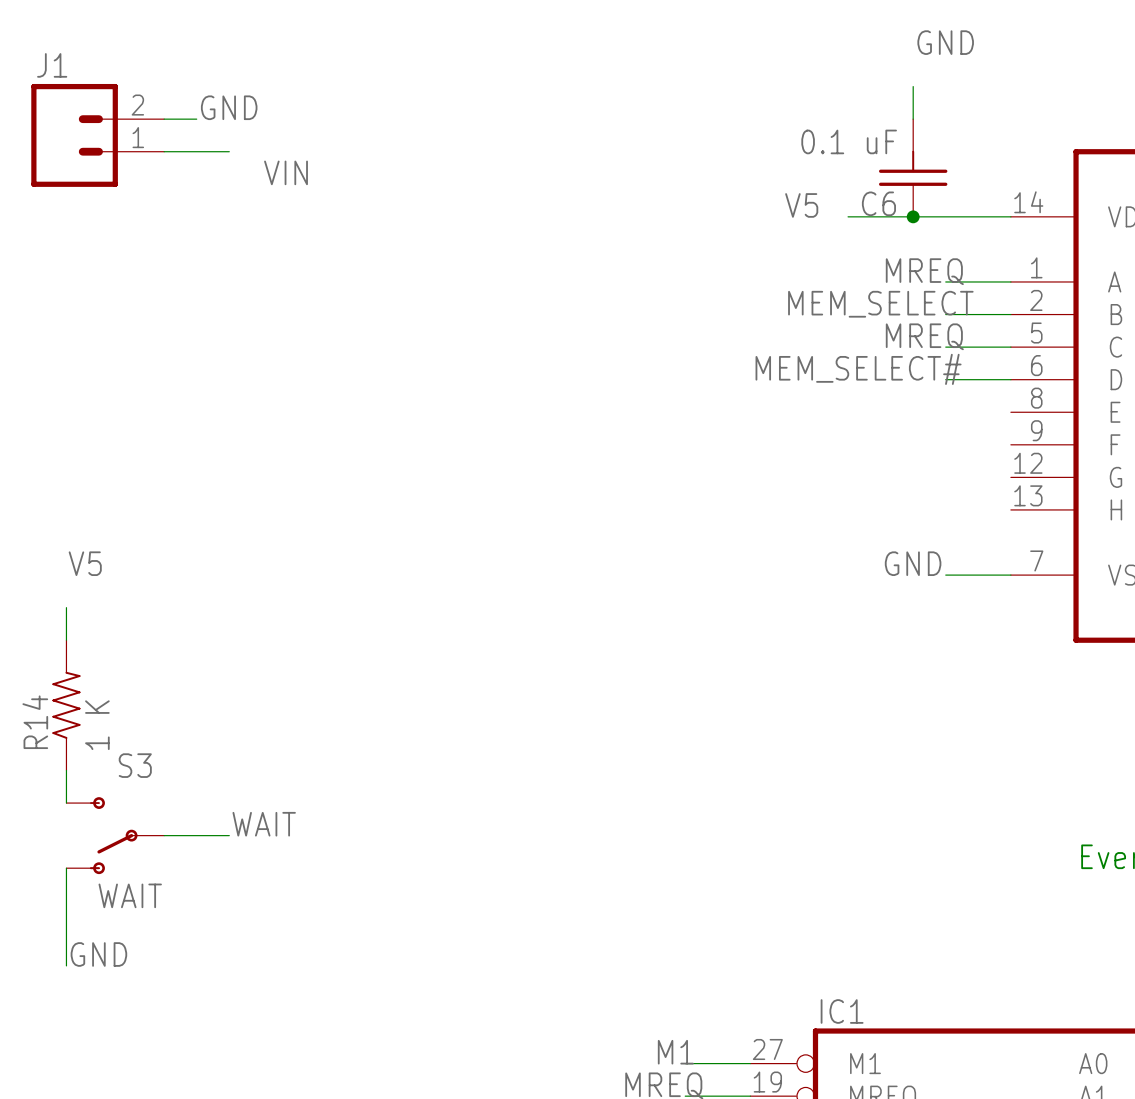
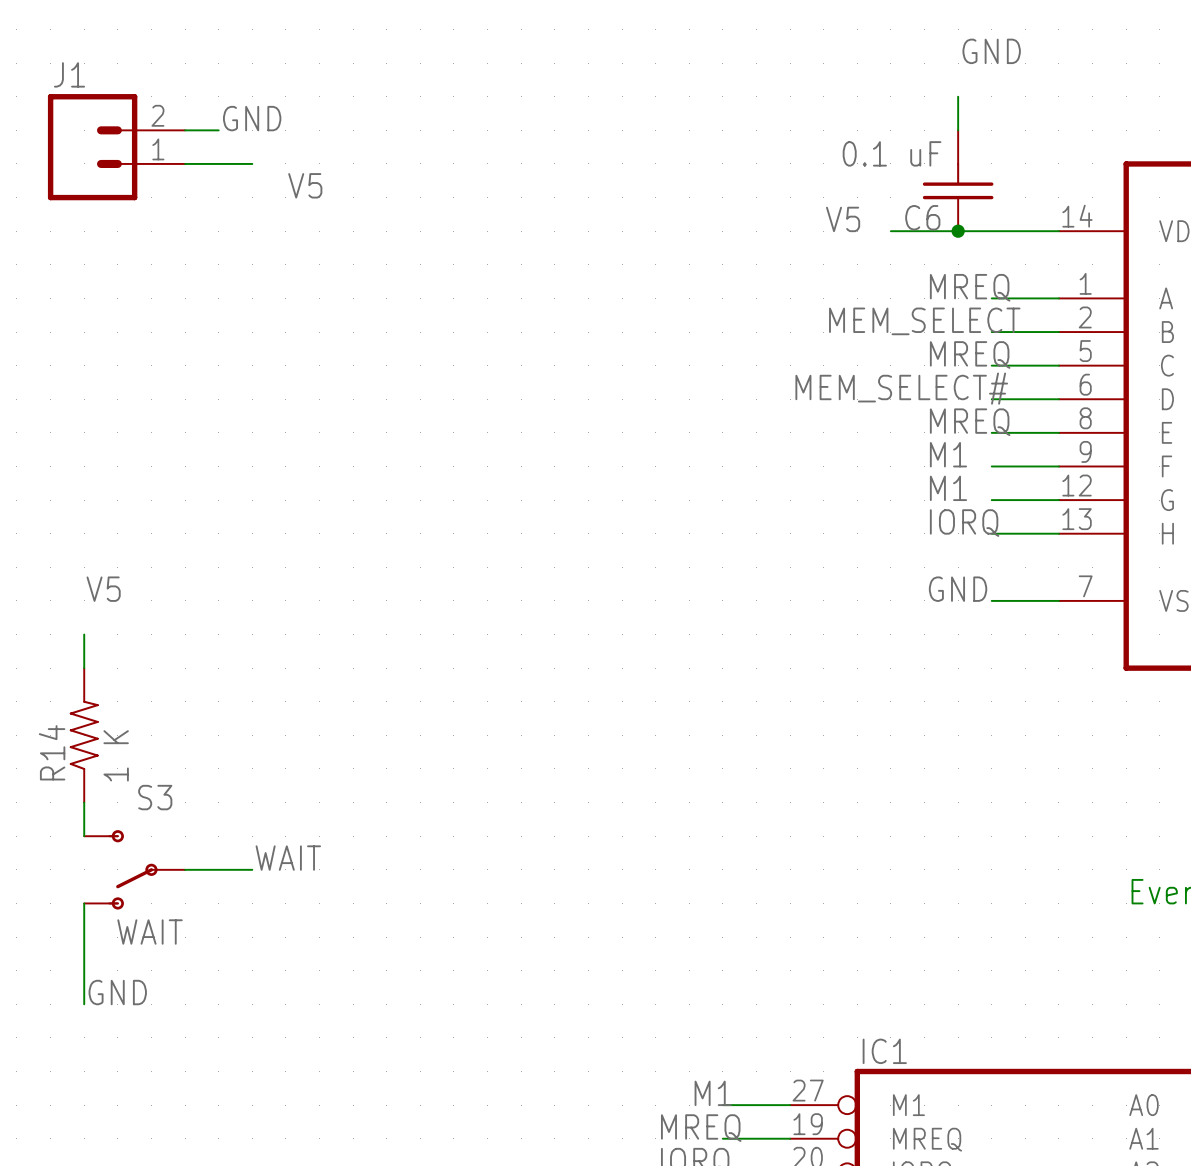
label: VIN (286, 172) -> V5 (305, 185)
label: none -> MREQ (970, 422)
wire: none -> (991, 432) (1058, 432)
label: none -> M1 (948, 454)
wire: none -> (991, 466) (1058, 466)
label: none -> M1 (948, 488)
wire: none -> (991, 500) (1058, 500)
label: none -> IORQ (964, 523)
wire: none -> (991, 533) (1058, 533)

